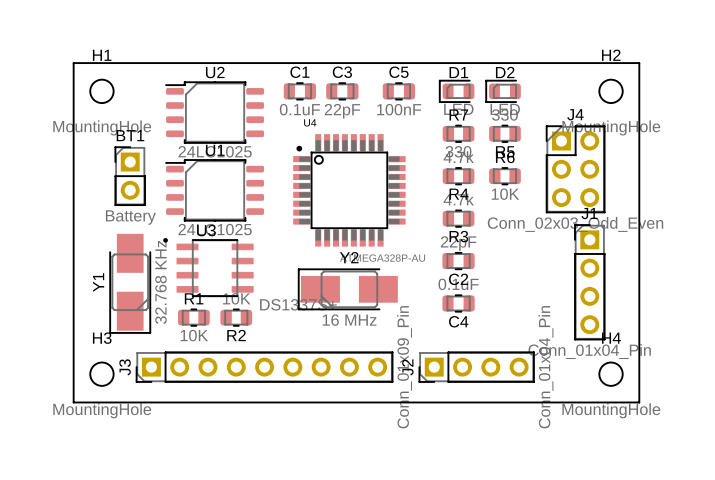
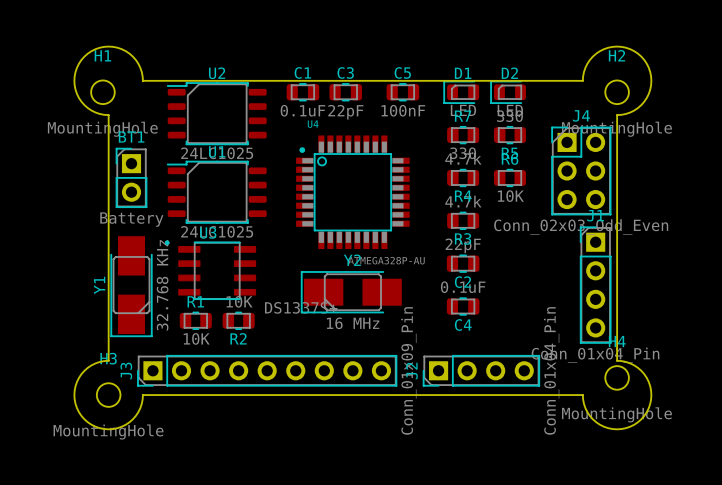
board edge: (73, 63) (639, 63) (639, 402) (73, 402) (73, 63) -> (142, 80) (141, 71) (135, 59) (125, 51) (113, 46) (99, 47) (87, 53) (78, 63) (74, 76) (75, 89) (81, 101) (95, 112) (108, 115) (108, 360) (95, 363) (84, 370) (76, 381) (74, 395) (78, 412) (91, 424) (108, 429) (125, 424) (138, 412) (142, 395) (582, 395) (585, 408) (592, 419) (603, 426) (617, 429) (634, 424) (646, 412) (651, 395) (646, 377) (634, 365) (617, 360) (617, 115) (630, 112) (641, 105) (648, 93) (651, 80) (646, 63) (634, 51) (617, 46) (599, 51) (587, 63) (582, 80) (142, 80)
H3 position: (101, 374) -> (108, 395)

